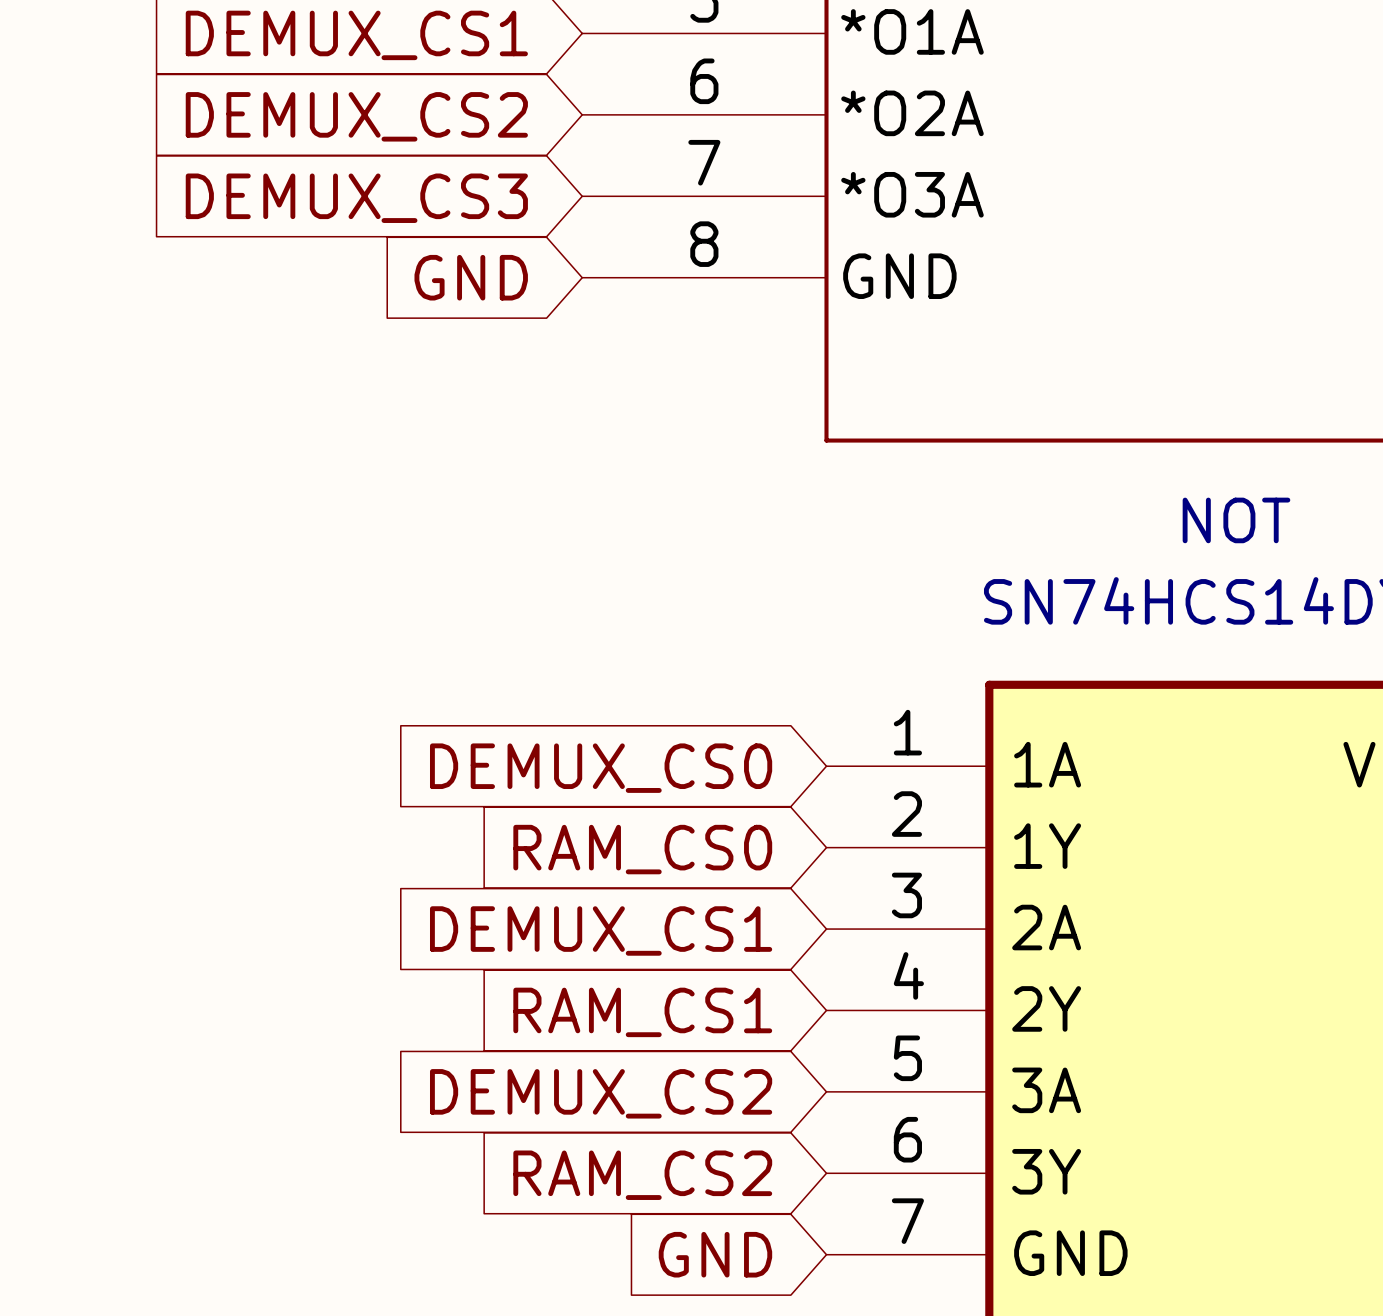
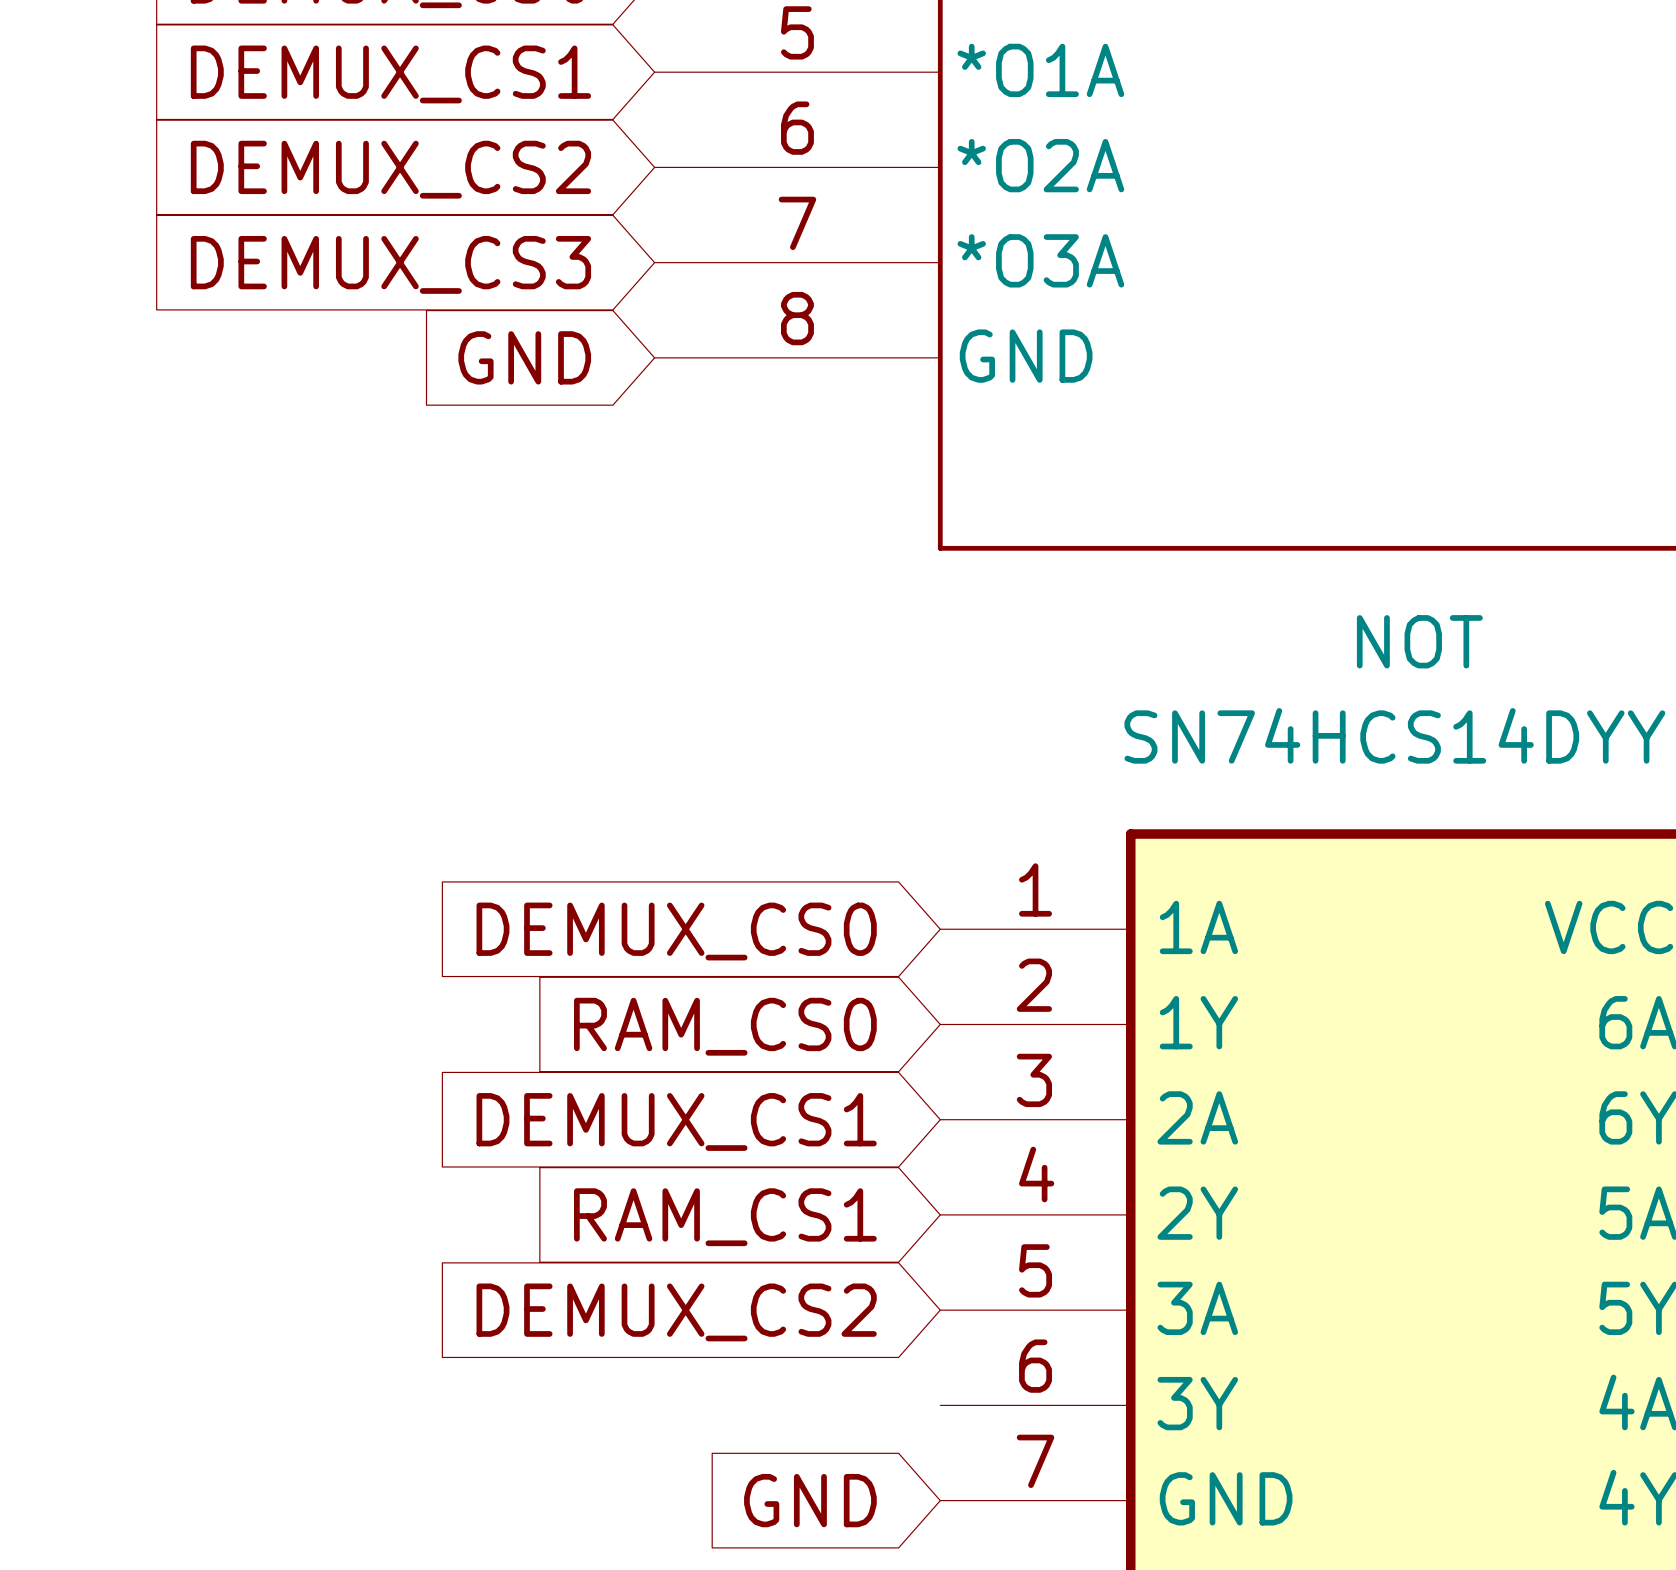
global label: RAM_CS2 (642, 1175) -> none

